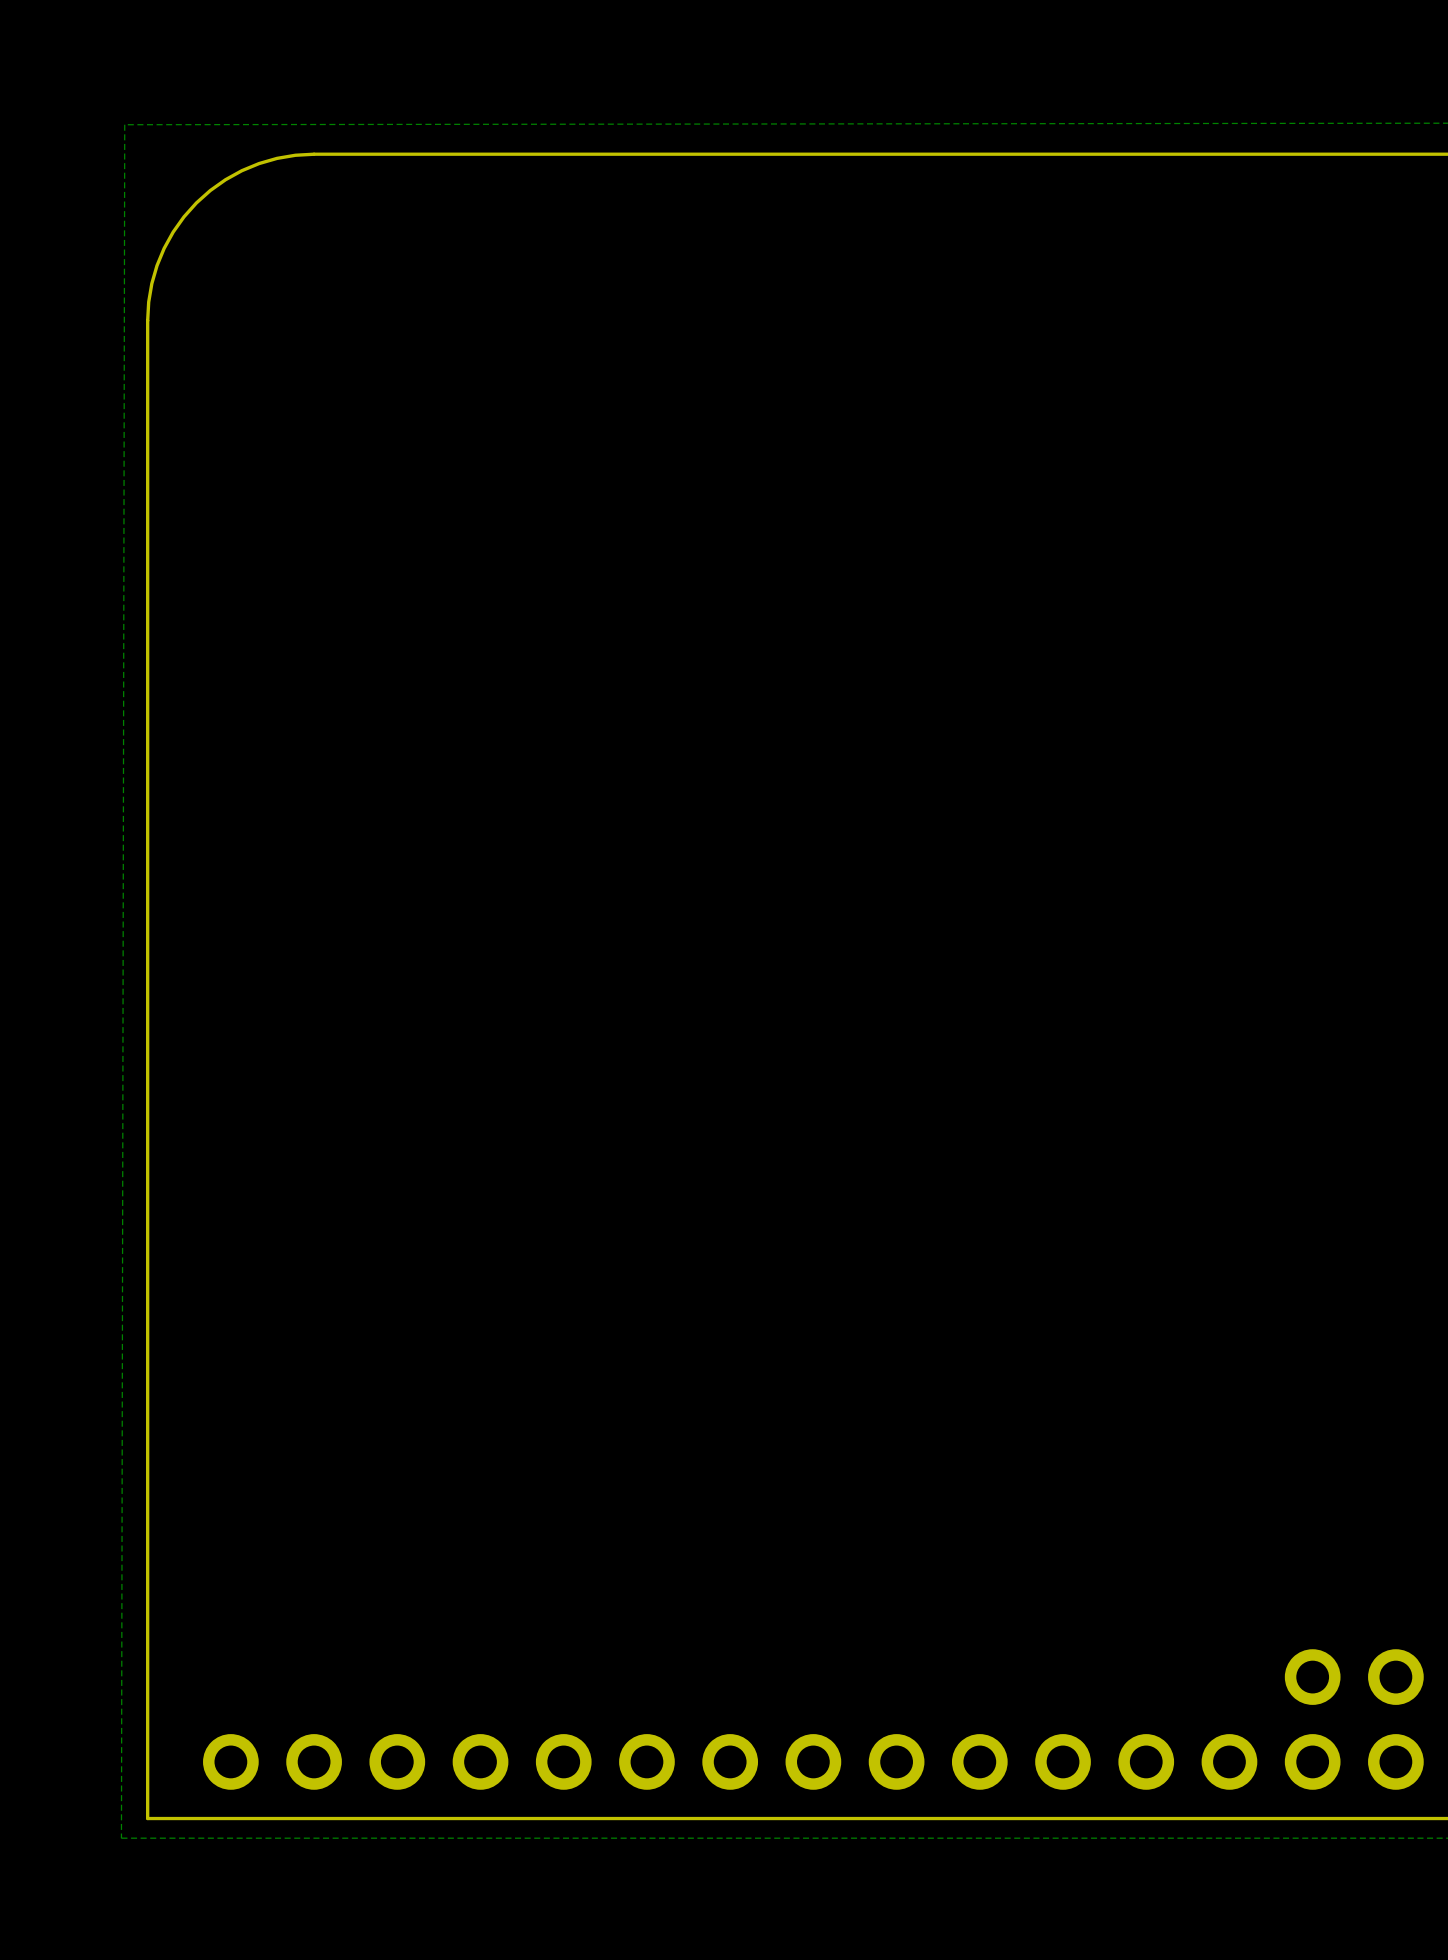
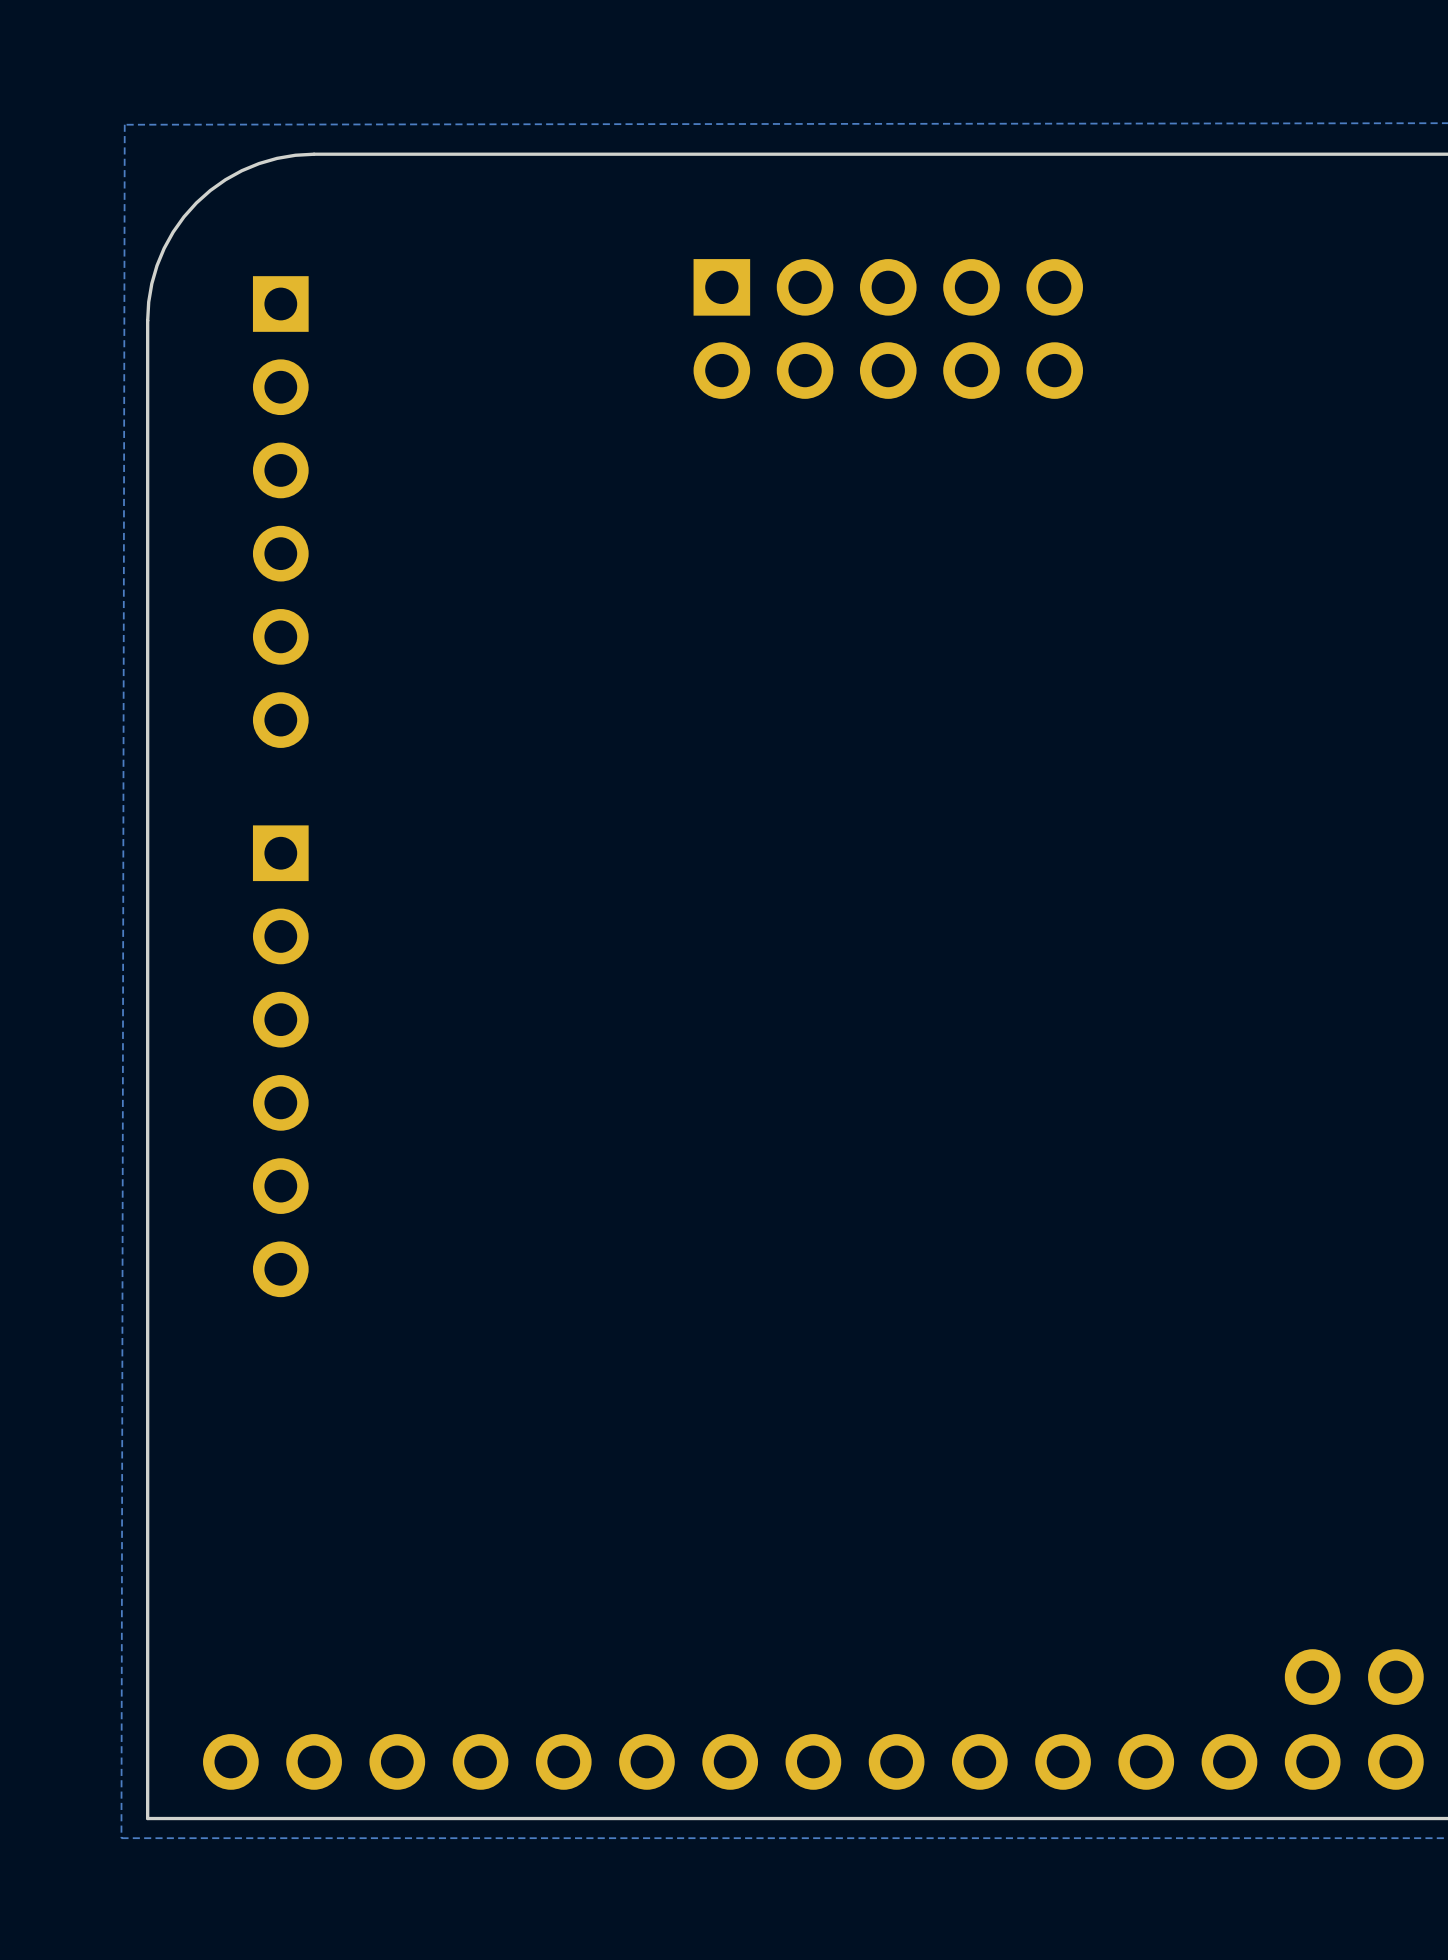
part: none -> (888, 328)
part: none -> (280, 512)
part: none -> (280, 1061)

